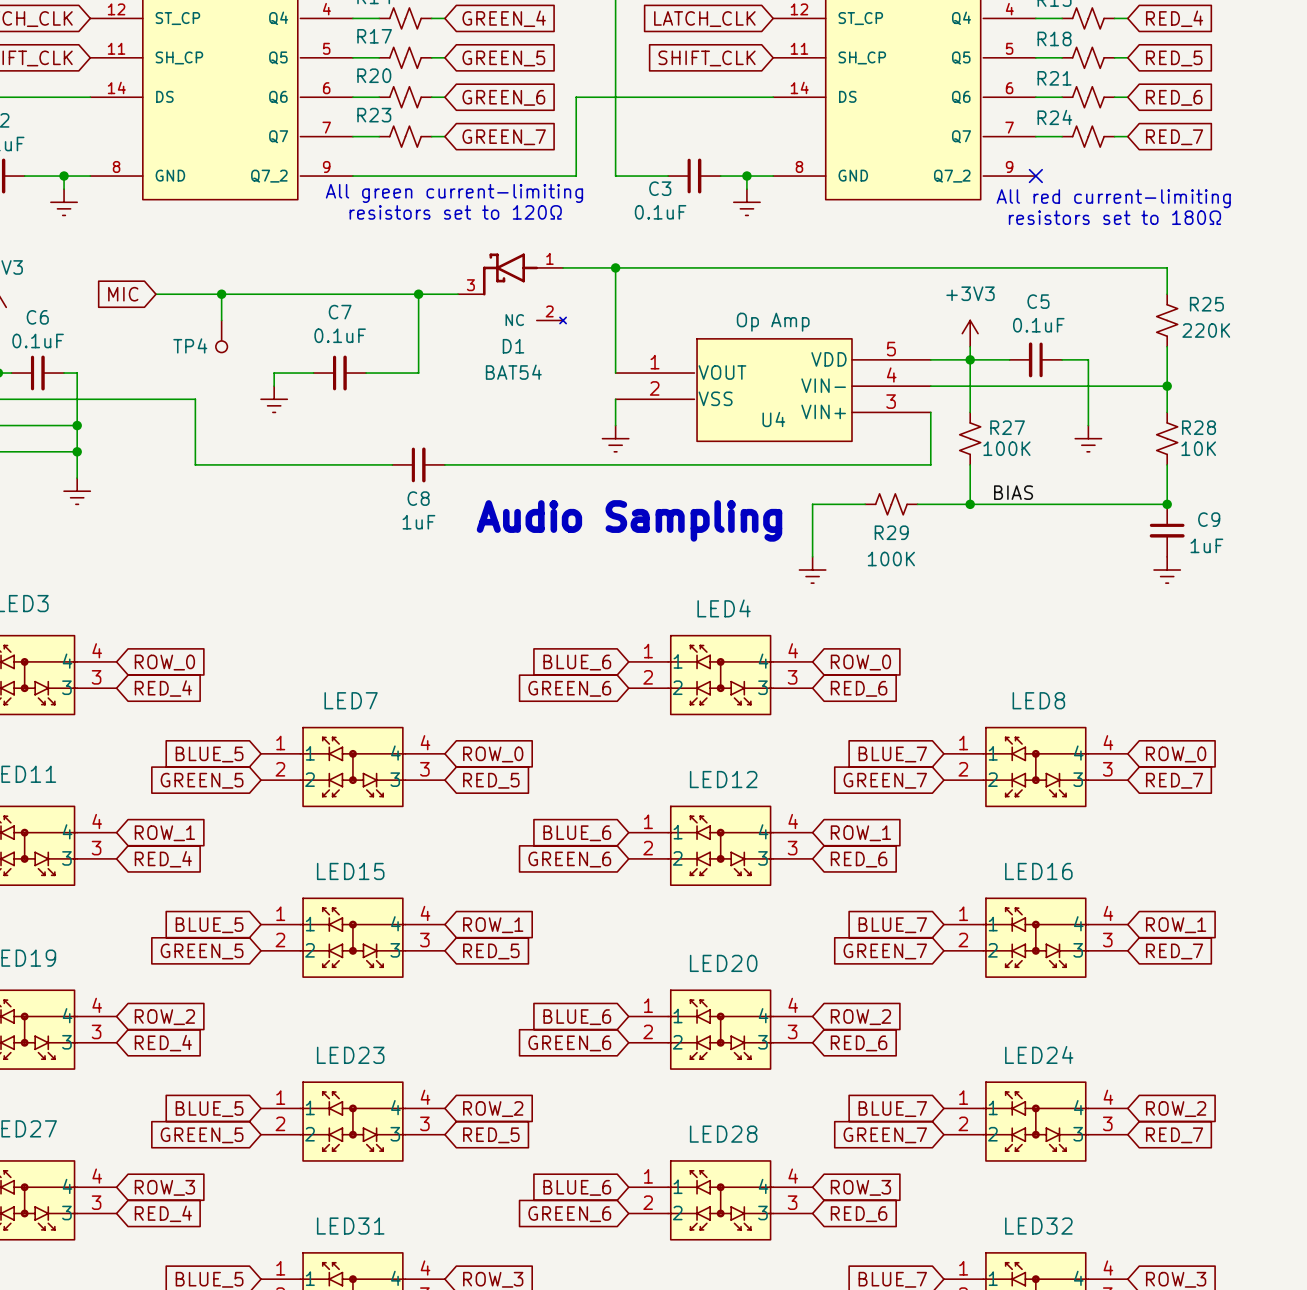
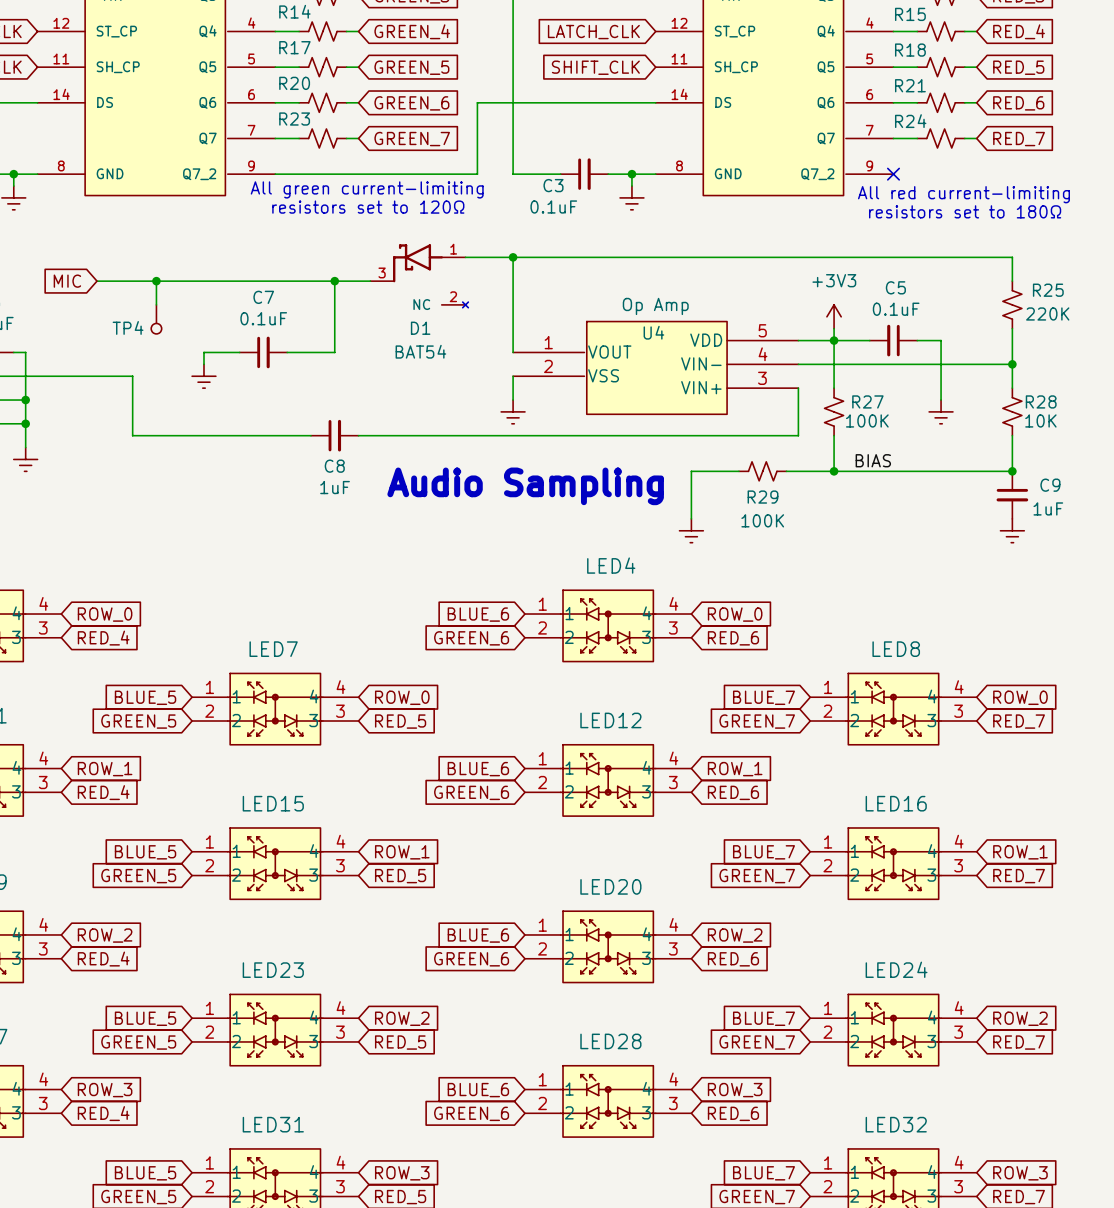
U4 name position: U4 (773, 419) -> U4 (653, 332)

